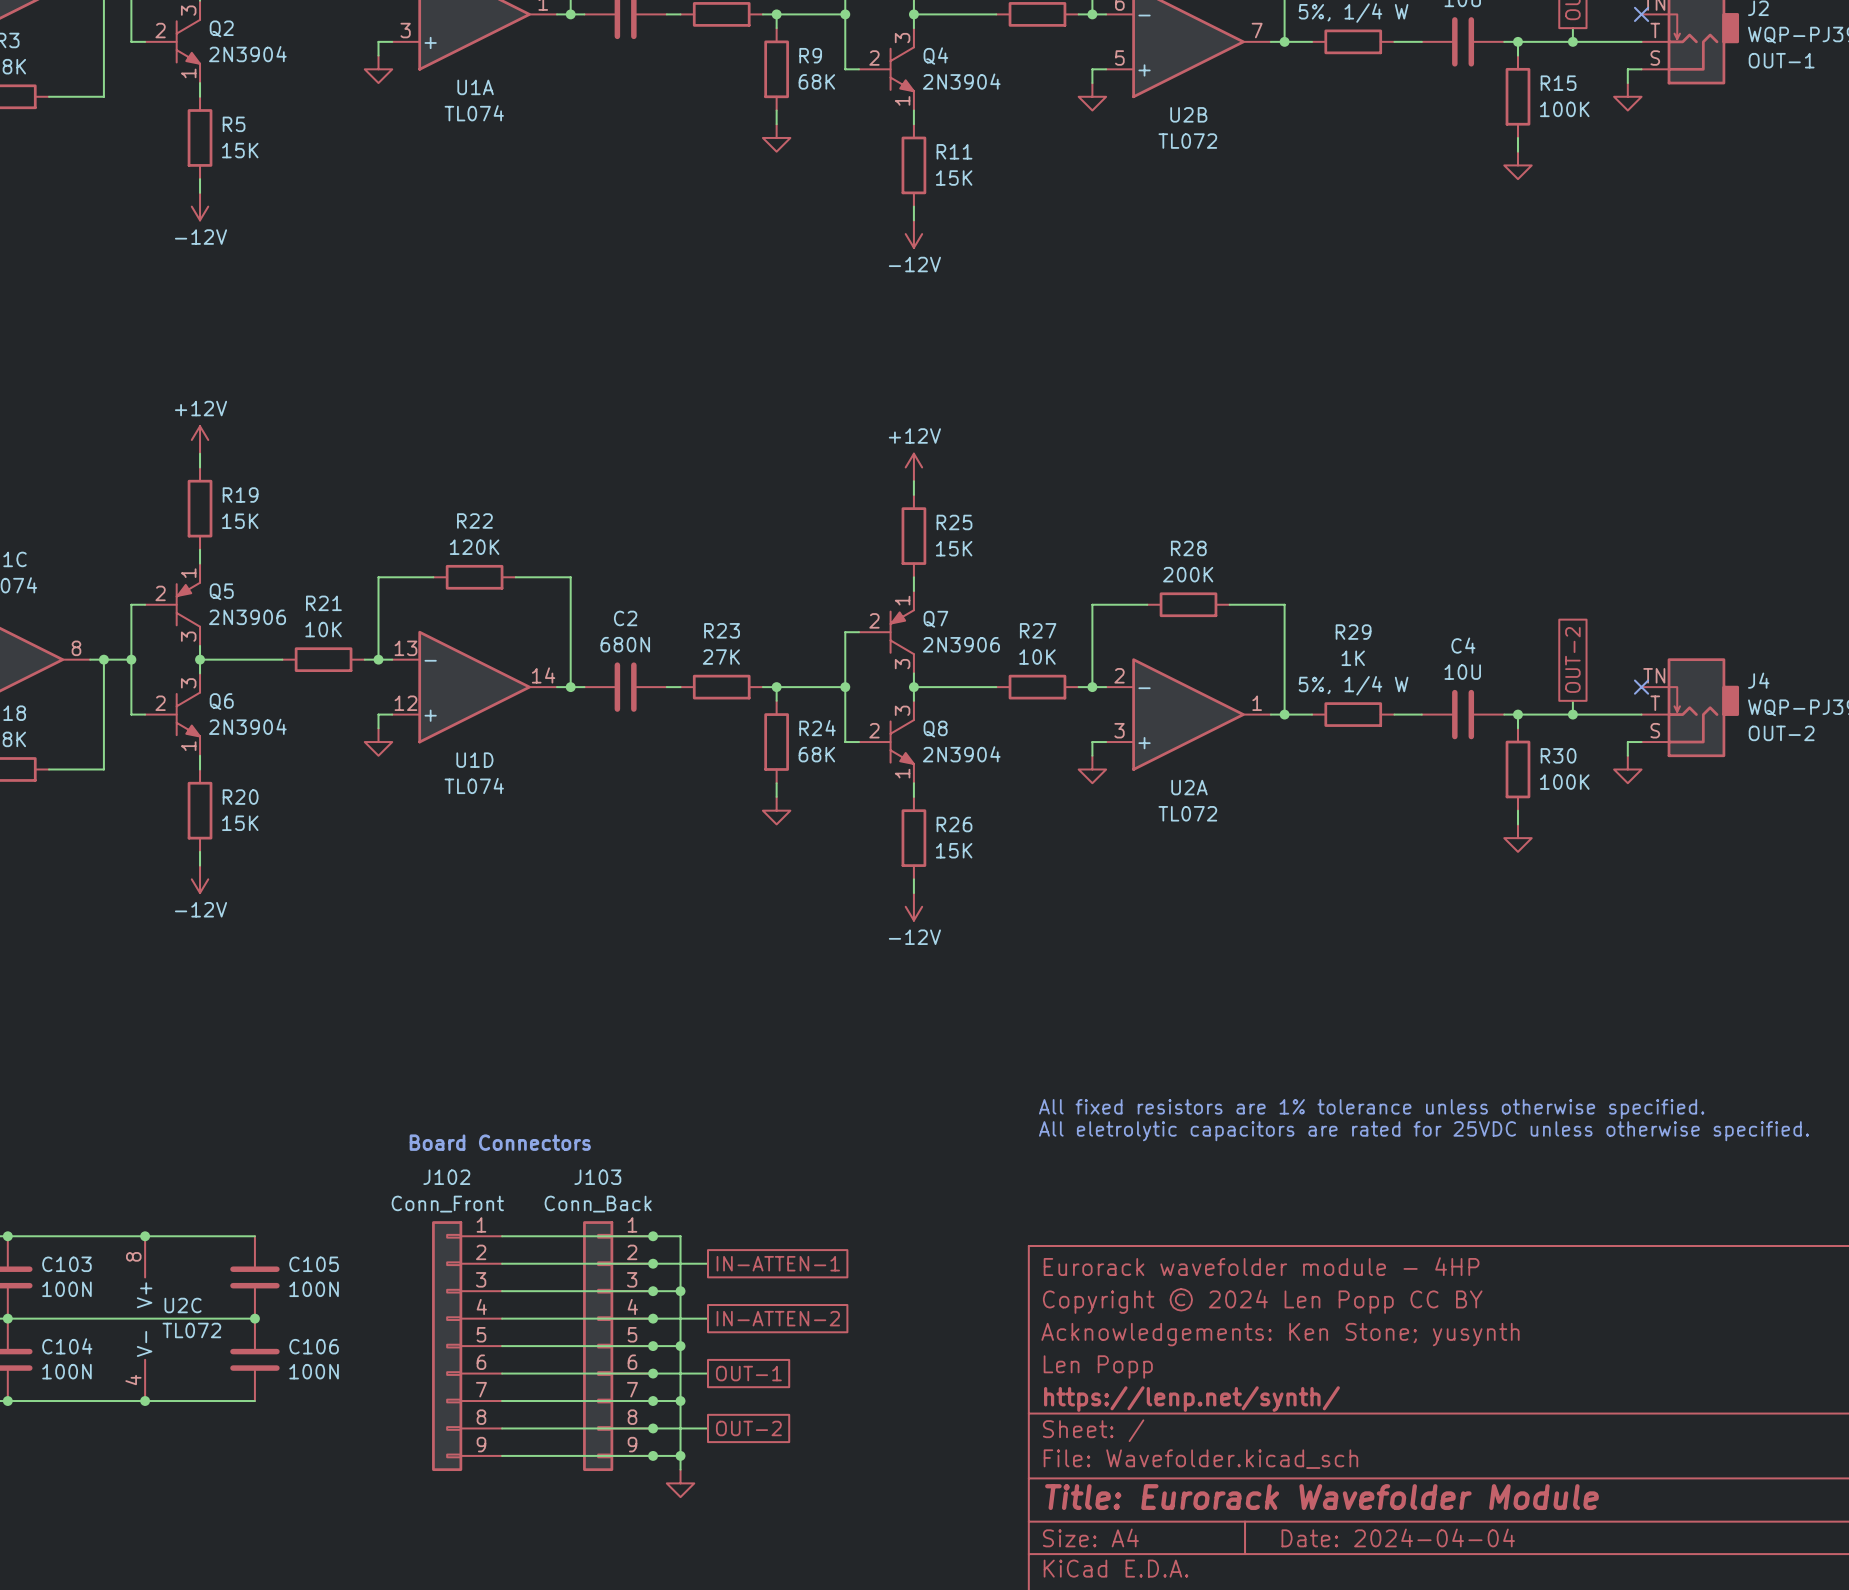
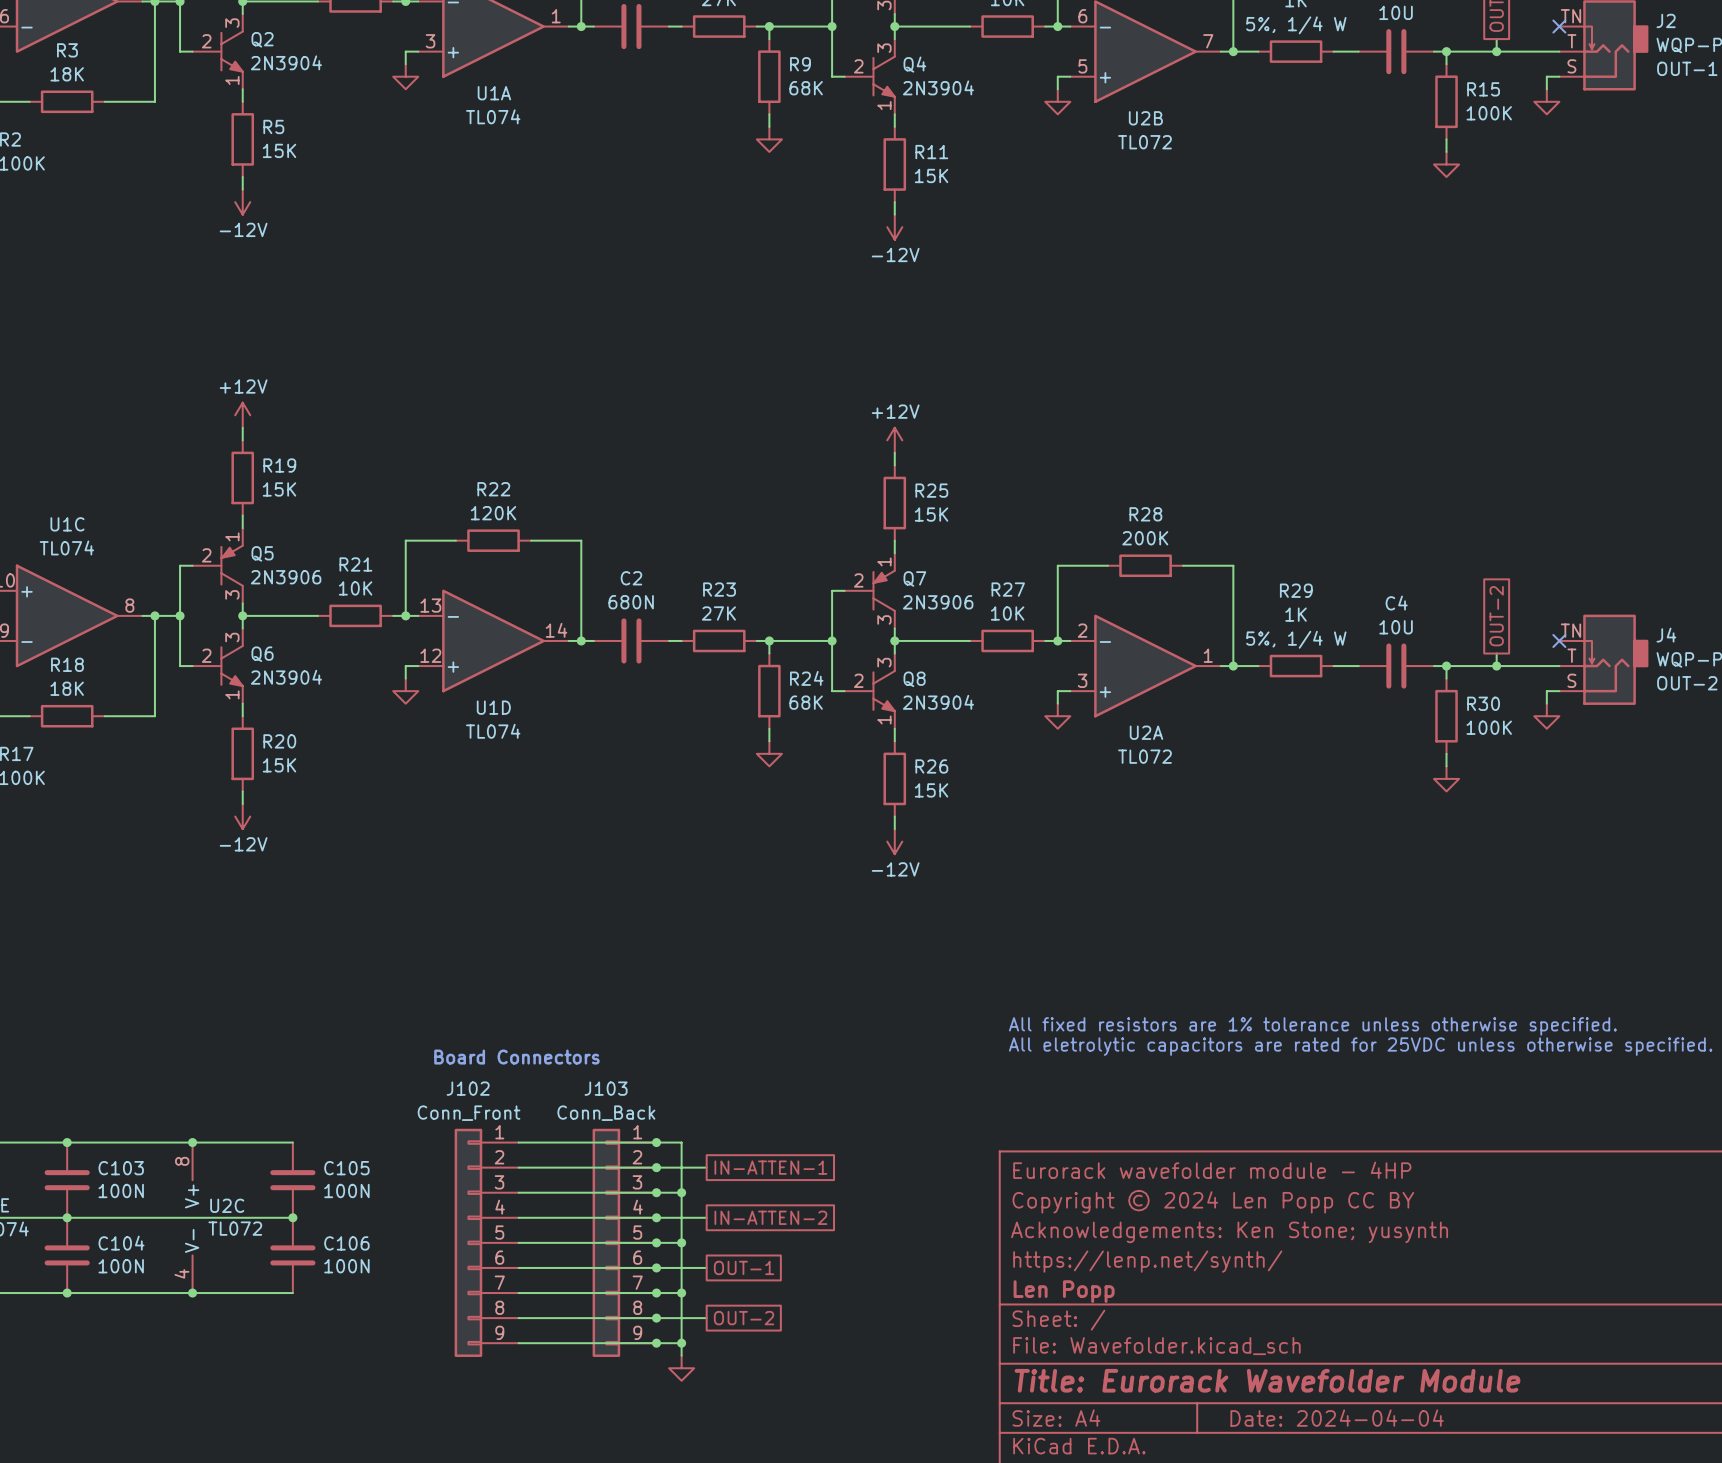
title block: Len Popp (1098, 1367) -> https://lenp.net/synth/ (1147, 1261)
title block: https://lenp.net/synth/ (1191, 1399) -> Len Popp (1064, 1291)

